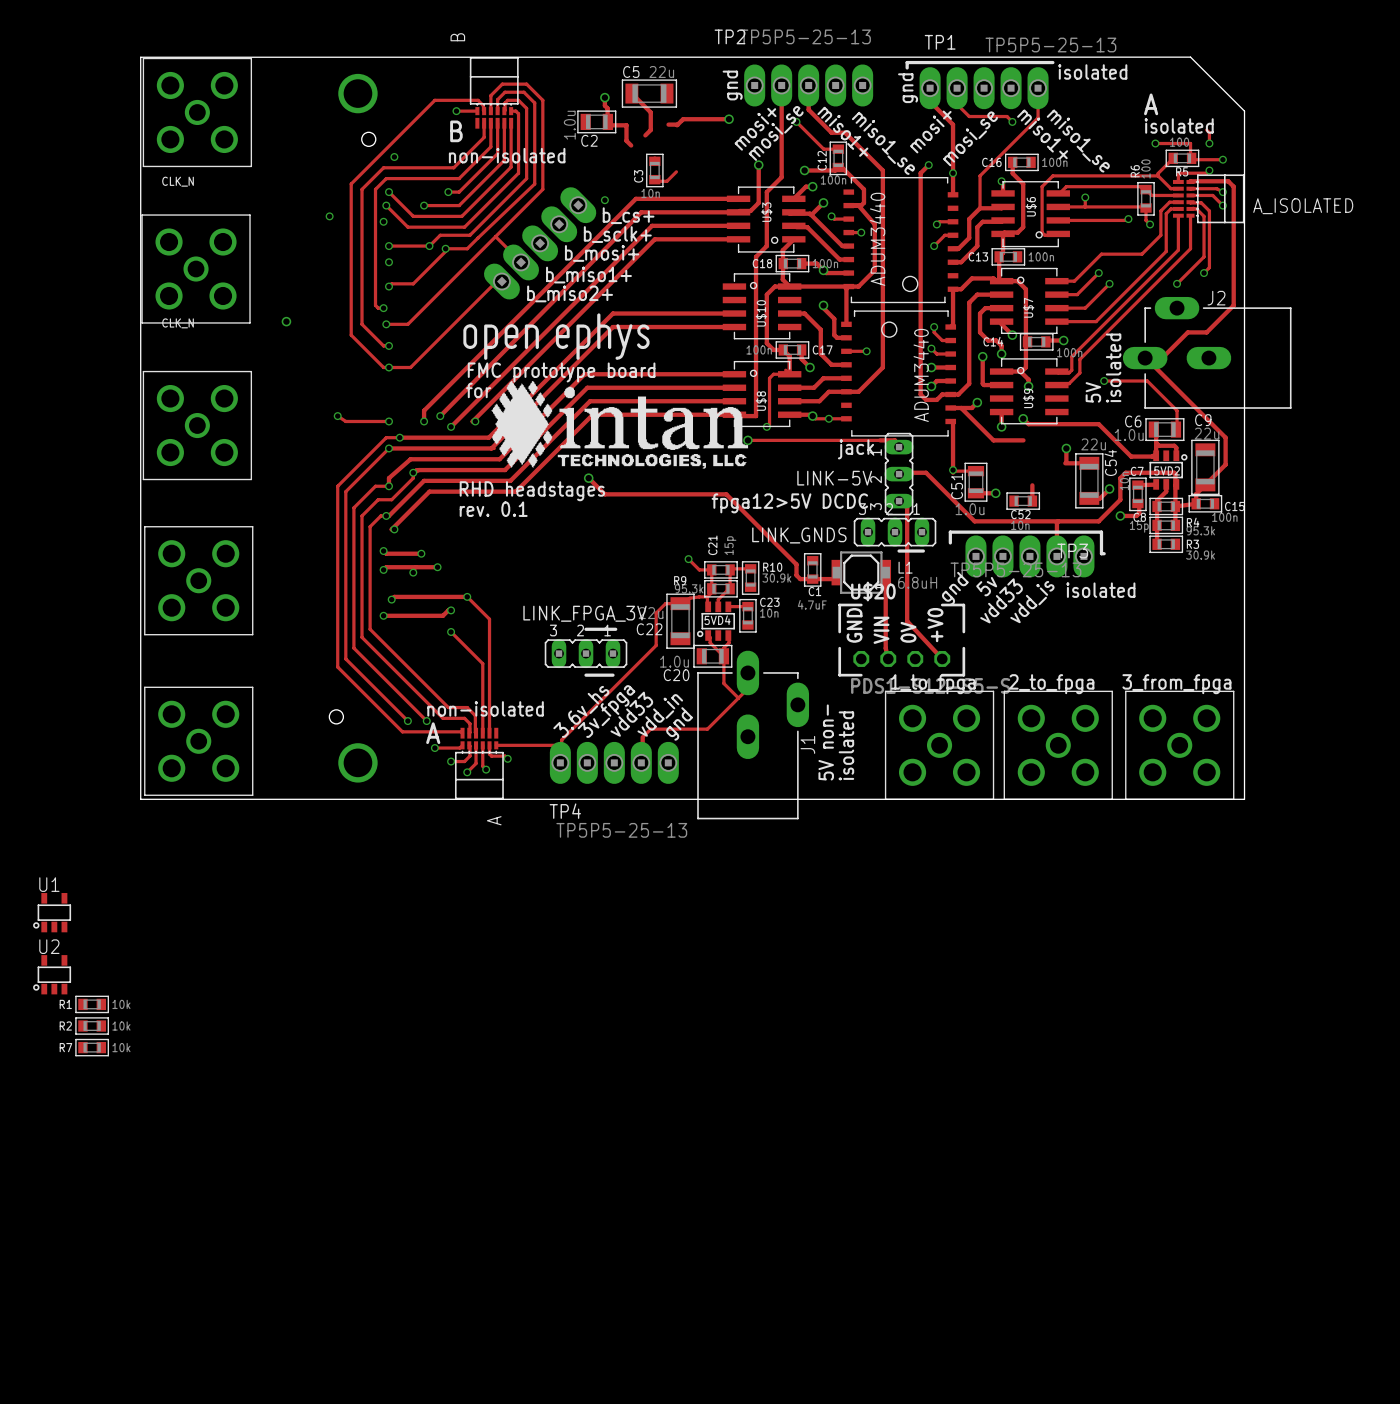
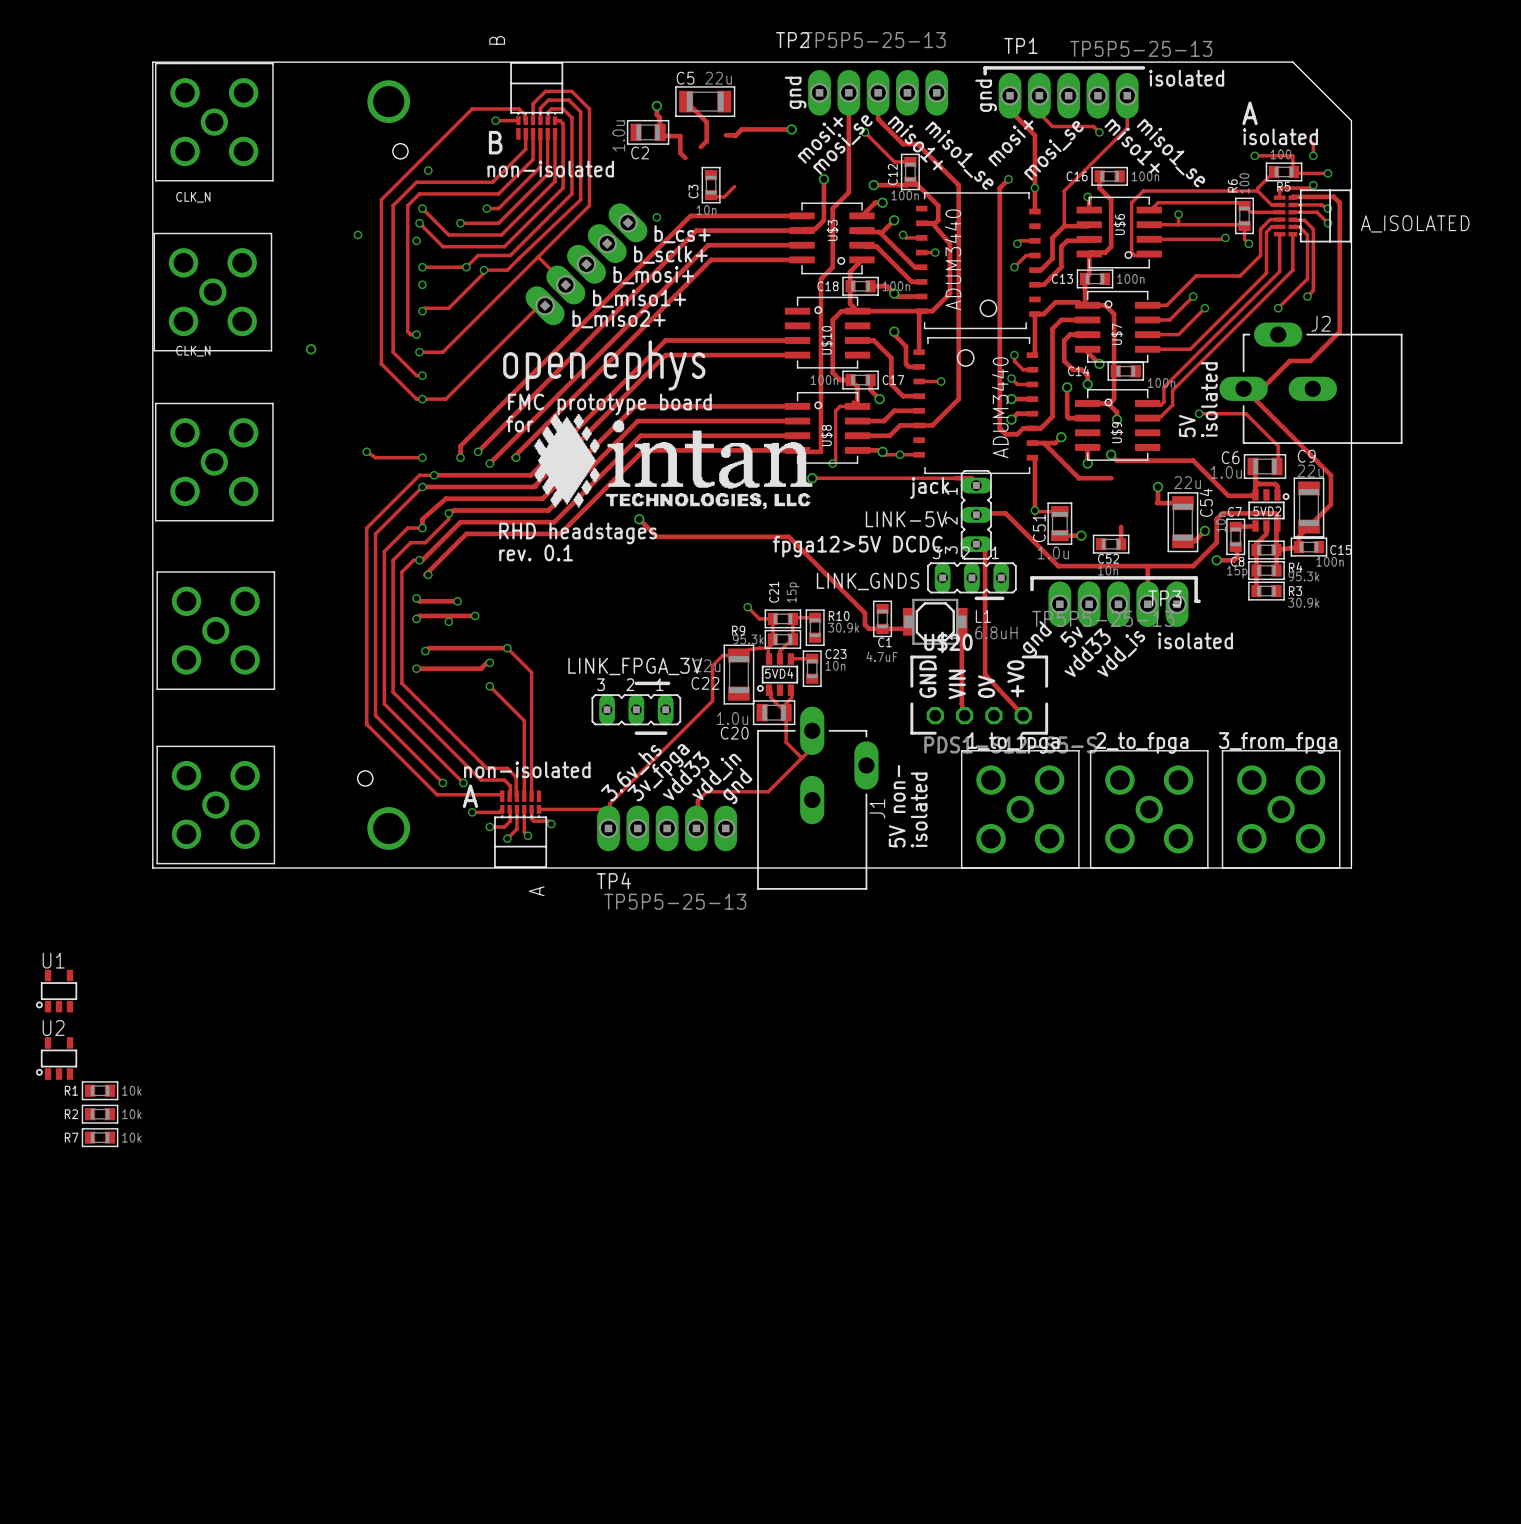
track: (1063, 340) (1045, 341) -> none
via: (1063, 340) -> none

